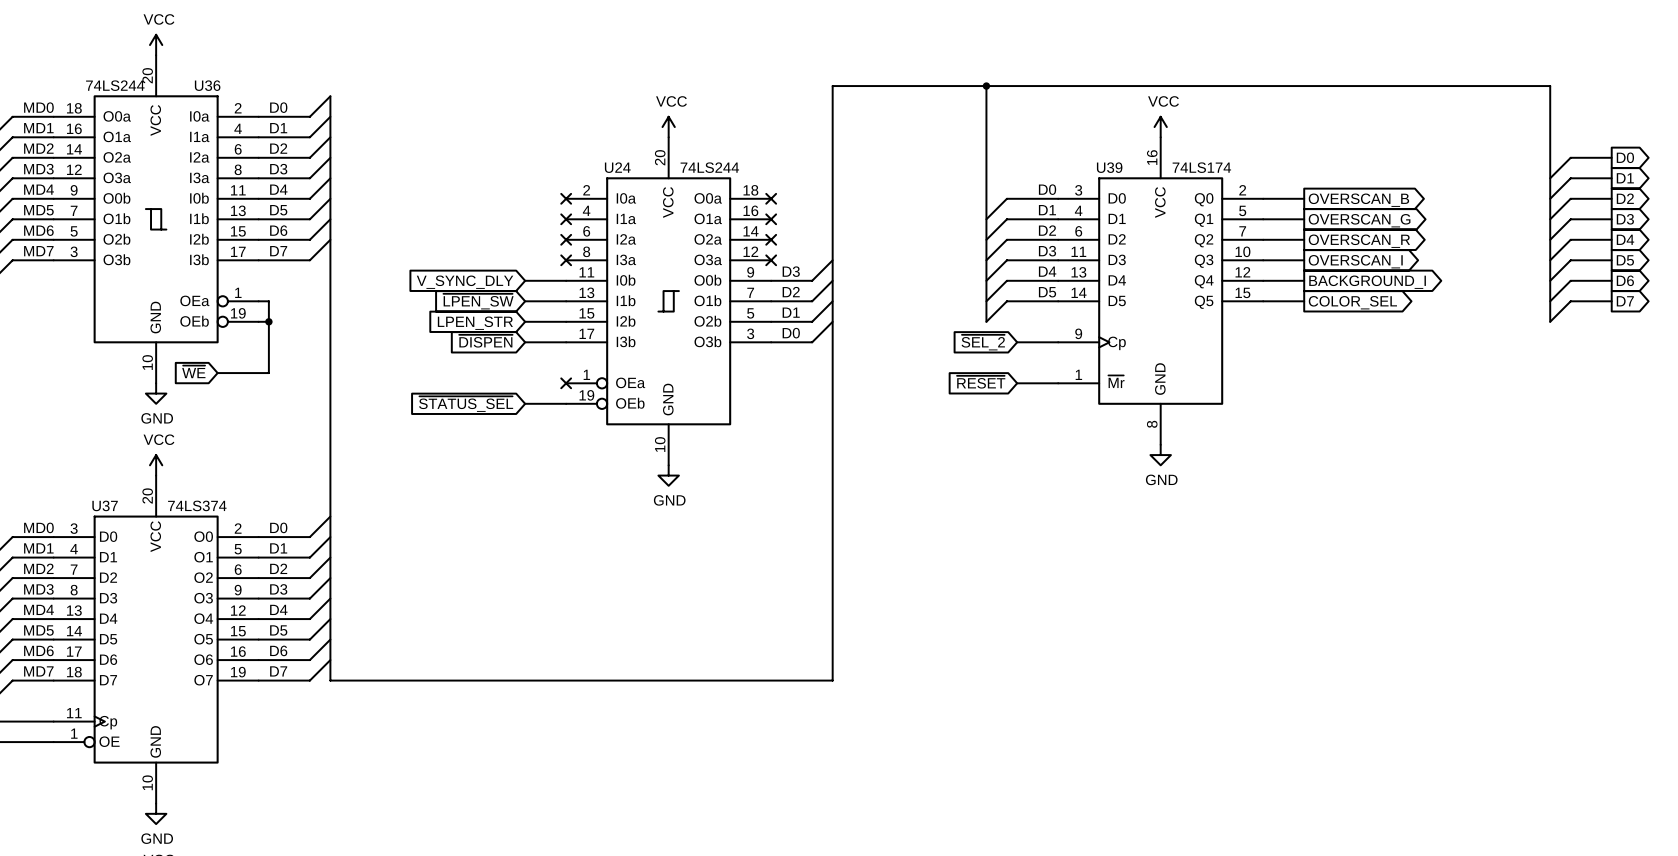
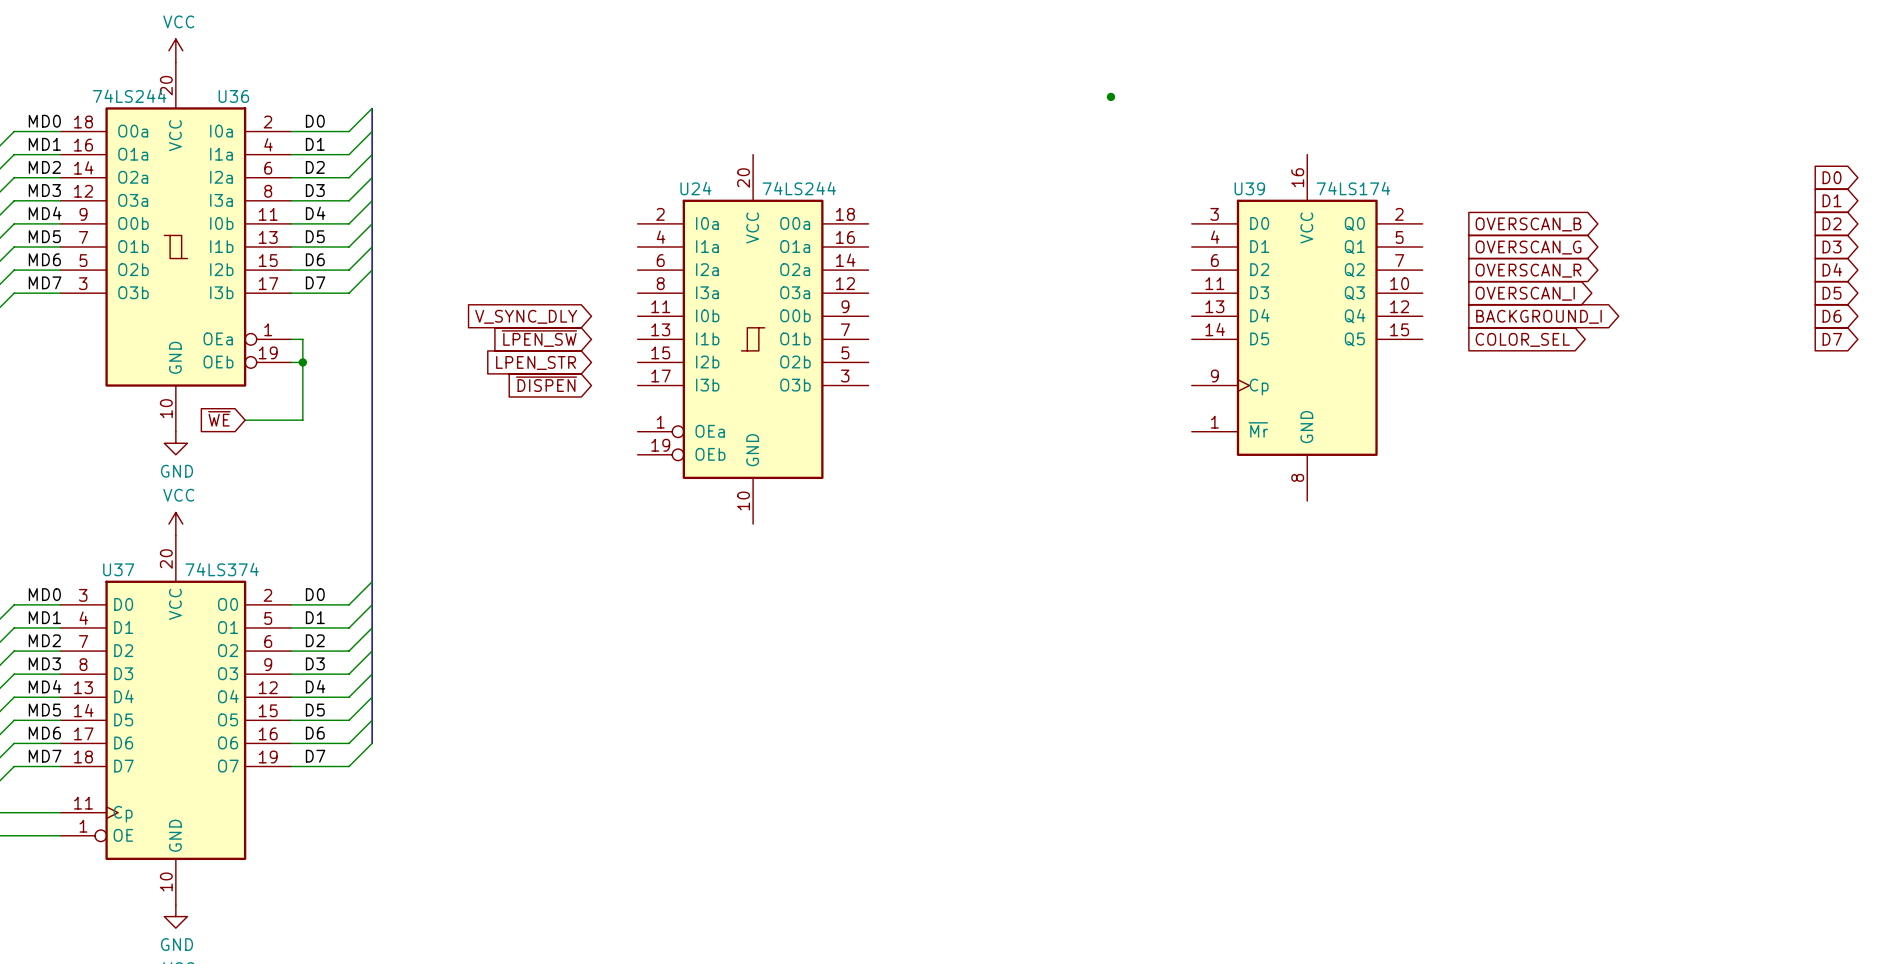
bus: (986, 86) (986, 321) -> none
power symbol: VCC (668, 127) -> none
power symbol: VCC (1160, 127) -> none
wire: (1611, 157) (1570, 157) (1550, 178) -> none
wire: (1611, 178) (1570, 178) (1550, 198) -> none
label: D0 (1047, 189) -> none
no-connect mark: (566, 198) -> none
no-connect mark: (771, 198) -> none
wire: (1058, 198) (1006, 198) (986, 219) -> none
wire: (1263, 198) (1304, 198) -> none
wire: (1611, 198) (1570, 198) (1550, 219) -> none
label: D1 (1047, 210) -> none
no-connect mark: (566, 219) -> none
no-connect mark: (771, 219) -> none
wire: (1058, 219) (1006, 219) (986, 239) -> none
wire: (1263, 219) (1304, 219) -> none
wire: (1611, 219) (1570, 219) (1550, 239) -> none
label: D2 (1047, 230) -> none
no-connect mark: (566, 239) -> none
no-connect mark: (771, 239) -> none
wire: (1058, 239) (1006, 239) (986, 260) -> none
wire: (1263, 239) (1304, 239) -> none
wire: (1611, 239) (1570, 239) (1550, 260) -> none
label: D3 (1047, 251) -> none
no-connect mark: (566, 260) -> none
no-connect mark: (771, 260) -> none
wire: (832, 260) (812, 280) (771, 280) -> none
wire: (1058, 260) (1006, 260) (986, 280) -> none
wire: (1263, 260) (1304, 260) -> none
wire: (1611, 260) (1570, 260) (1550, 280) -> none
label: D3 (791, 271) -> none
label: D4 (1047, 271) -> none
wire: (525, 280) (566, 280) -> none
wire: (832, 280) (812, 301) (771, 301) -> none
wire: (1058, 280) (1006, 280) (986, 301) -> none
wire: (1263, 280) (1304, 280) -> none
wire: (1611, 280) (1570, 280) (1550, 301) -> none
label: D2 (791, 292) -> none
label: D5 (1047, 292) -> none
wire: (525, 301) (566, 301) -> none
wire: (832, 301) (812, 321) (771, 321) -> none
wire: (1058, 301) (1006, 301) (986, 321) -> none
wire: (1263, 301) (1304, 301) -> none
wire: (1611, 301) (1570, 301) (1550, 321) -> none
label: D1 (791, 312) -> none
wire: (525, 321) (566, 321) -> none
wire: (832, 321) (812, 342) (771, 342) -> none
bus: (1550, 321) (1550, 86) (832, 86) (832, 680) (330, 680) (330, 660) -> none
label: D0 (791, 333) -> none
wire: (525, 342) (566, 342) -> none
global label: ~{SEL_2} (983, 342) -> none
wire: (1017, 342) (1058, 342) -> none
global label: ~{RESET} (981, 382) -> none
no-connect mark: (566, 383) -> none
wire: (1017, 383) (1058, 383) -> none
wire: (525, 403) (566, 403) -> none
global label: ~{STATUS_SEL} (466, 404) -> none
power symbol: GND (1160, 455) -> none
power symbol: GND (668, 475) -> none

